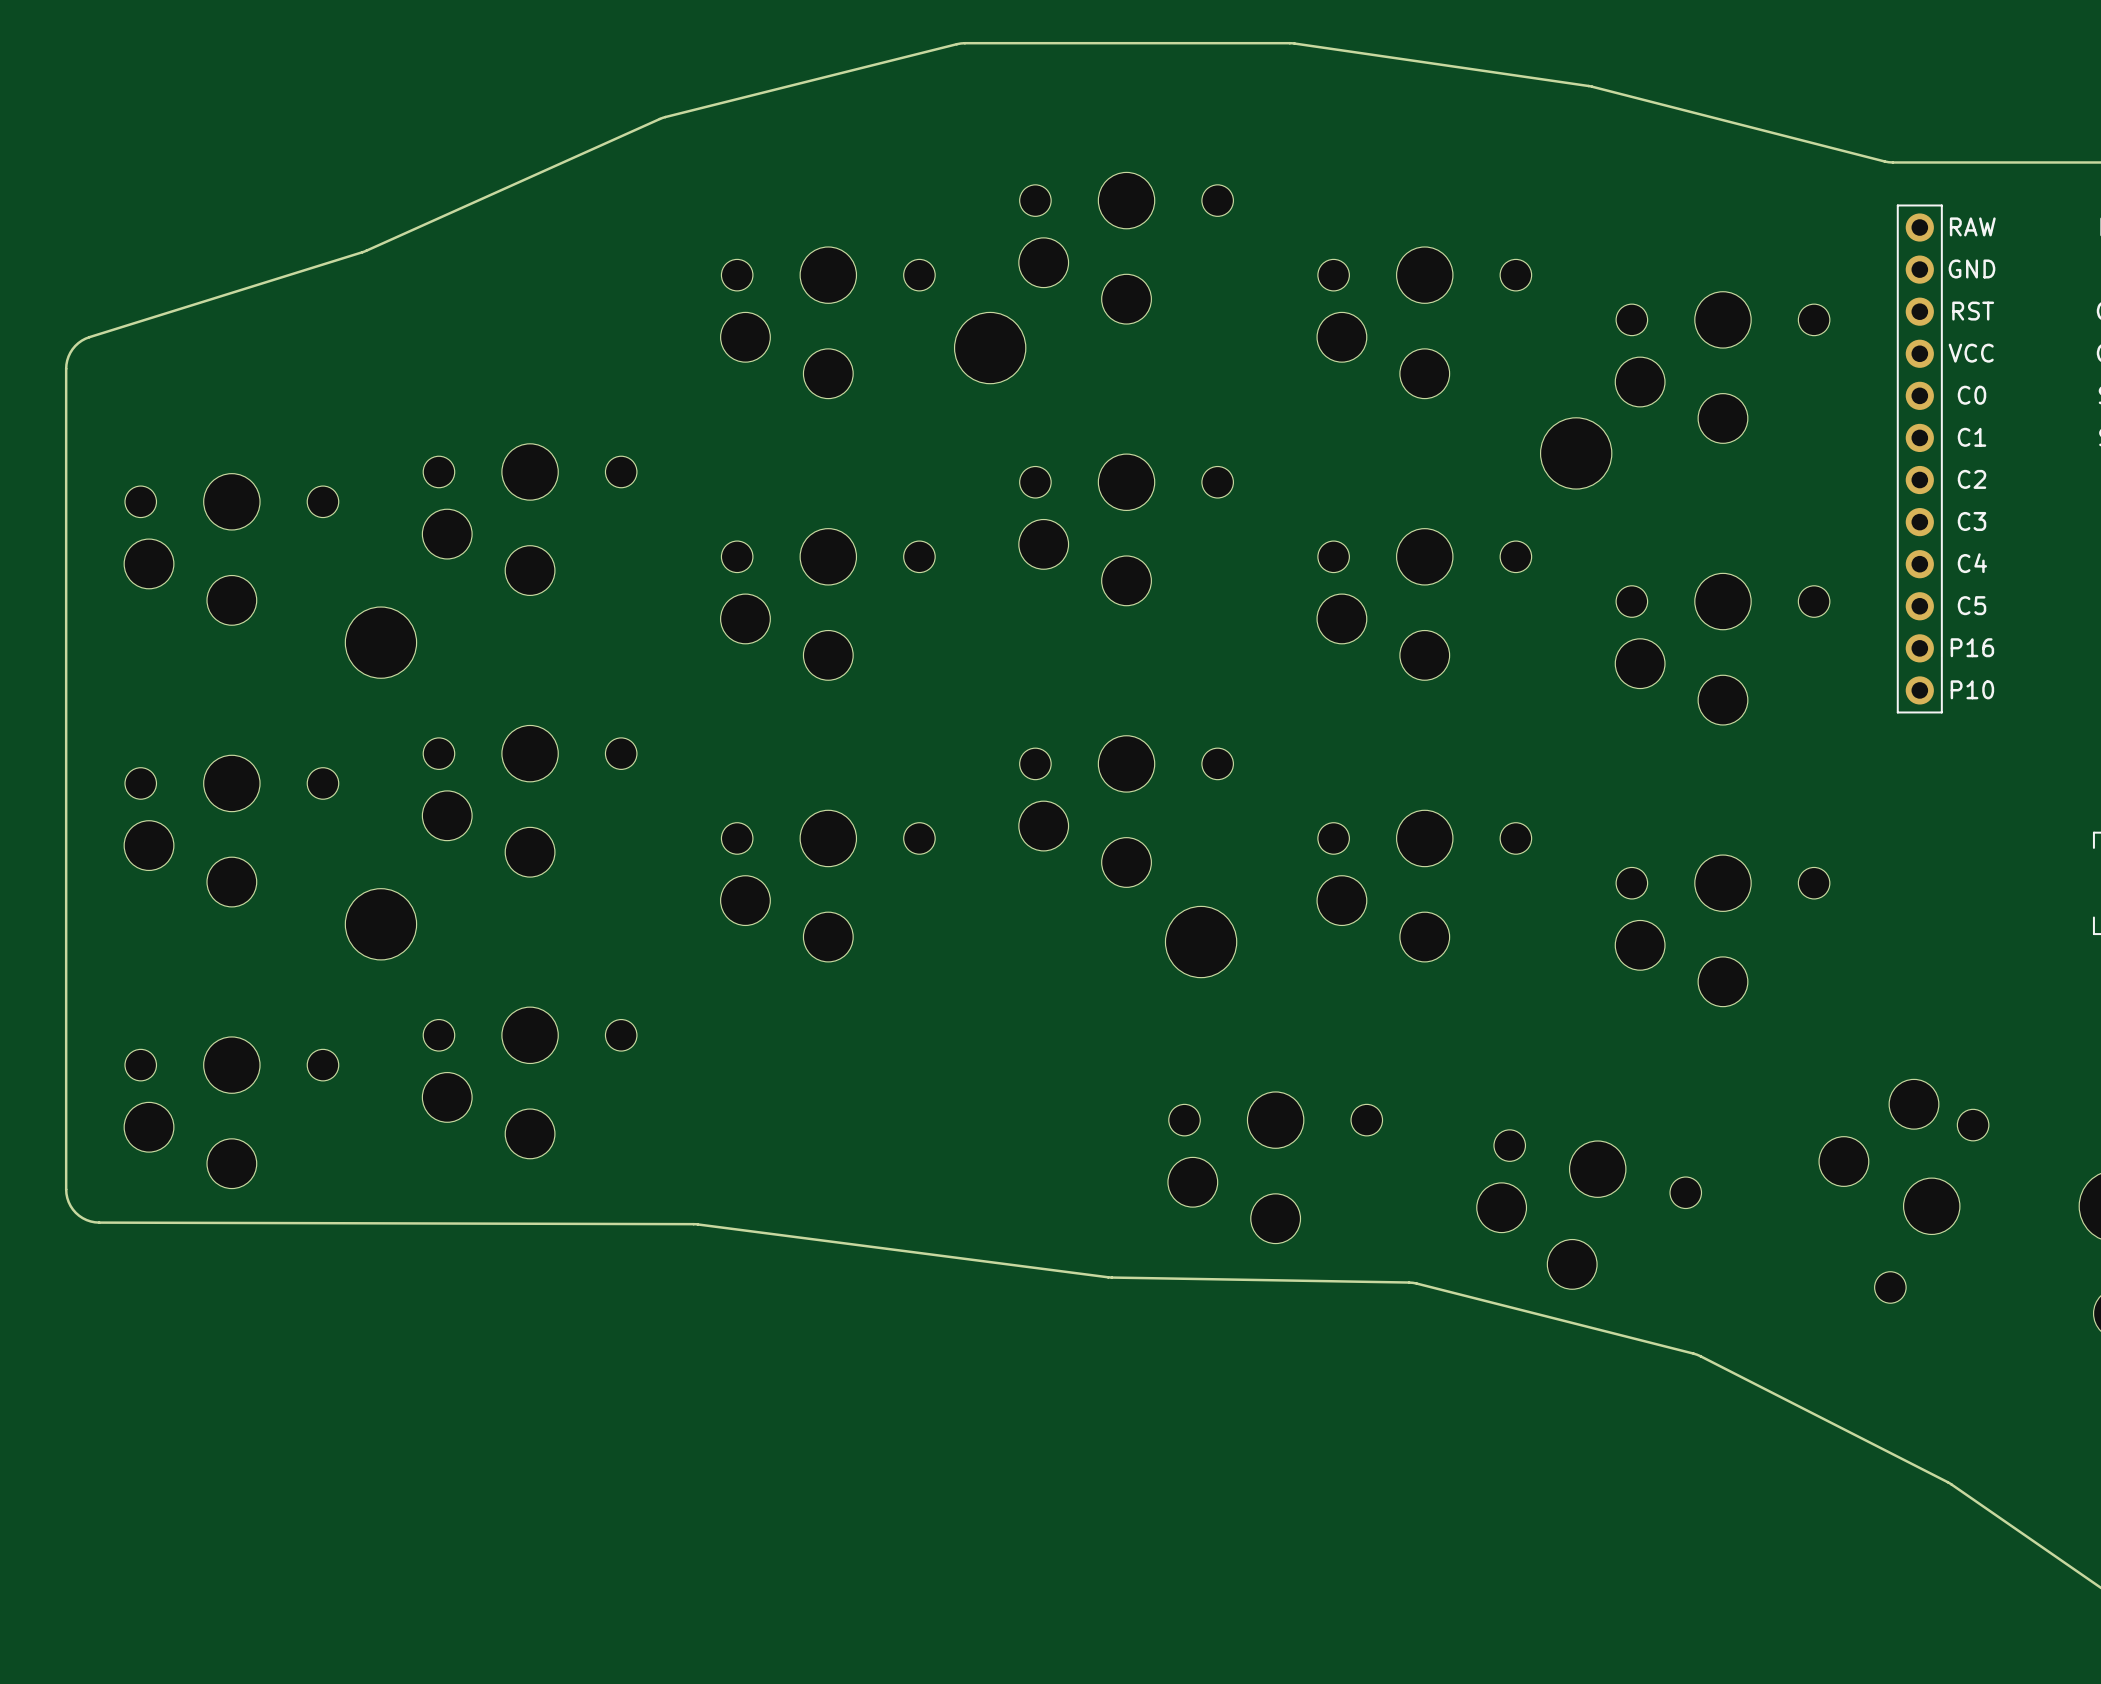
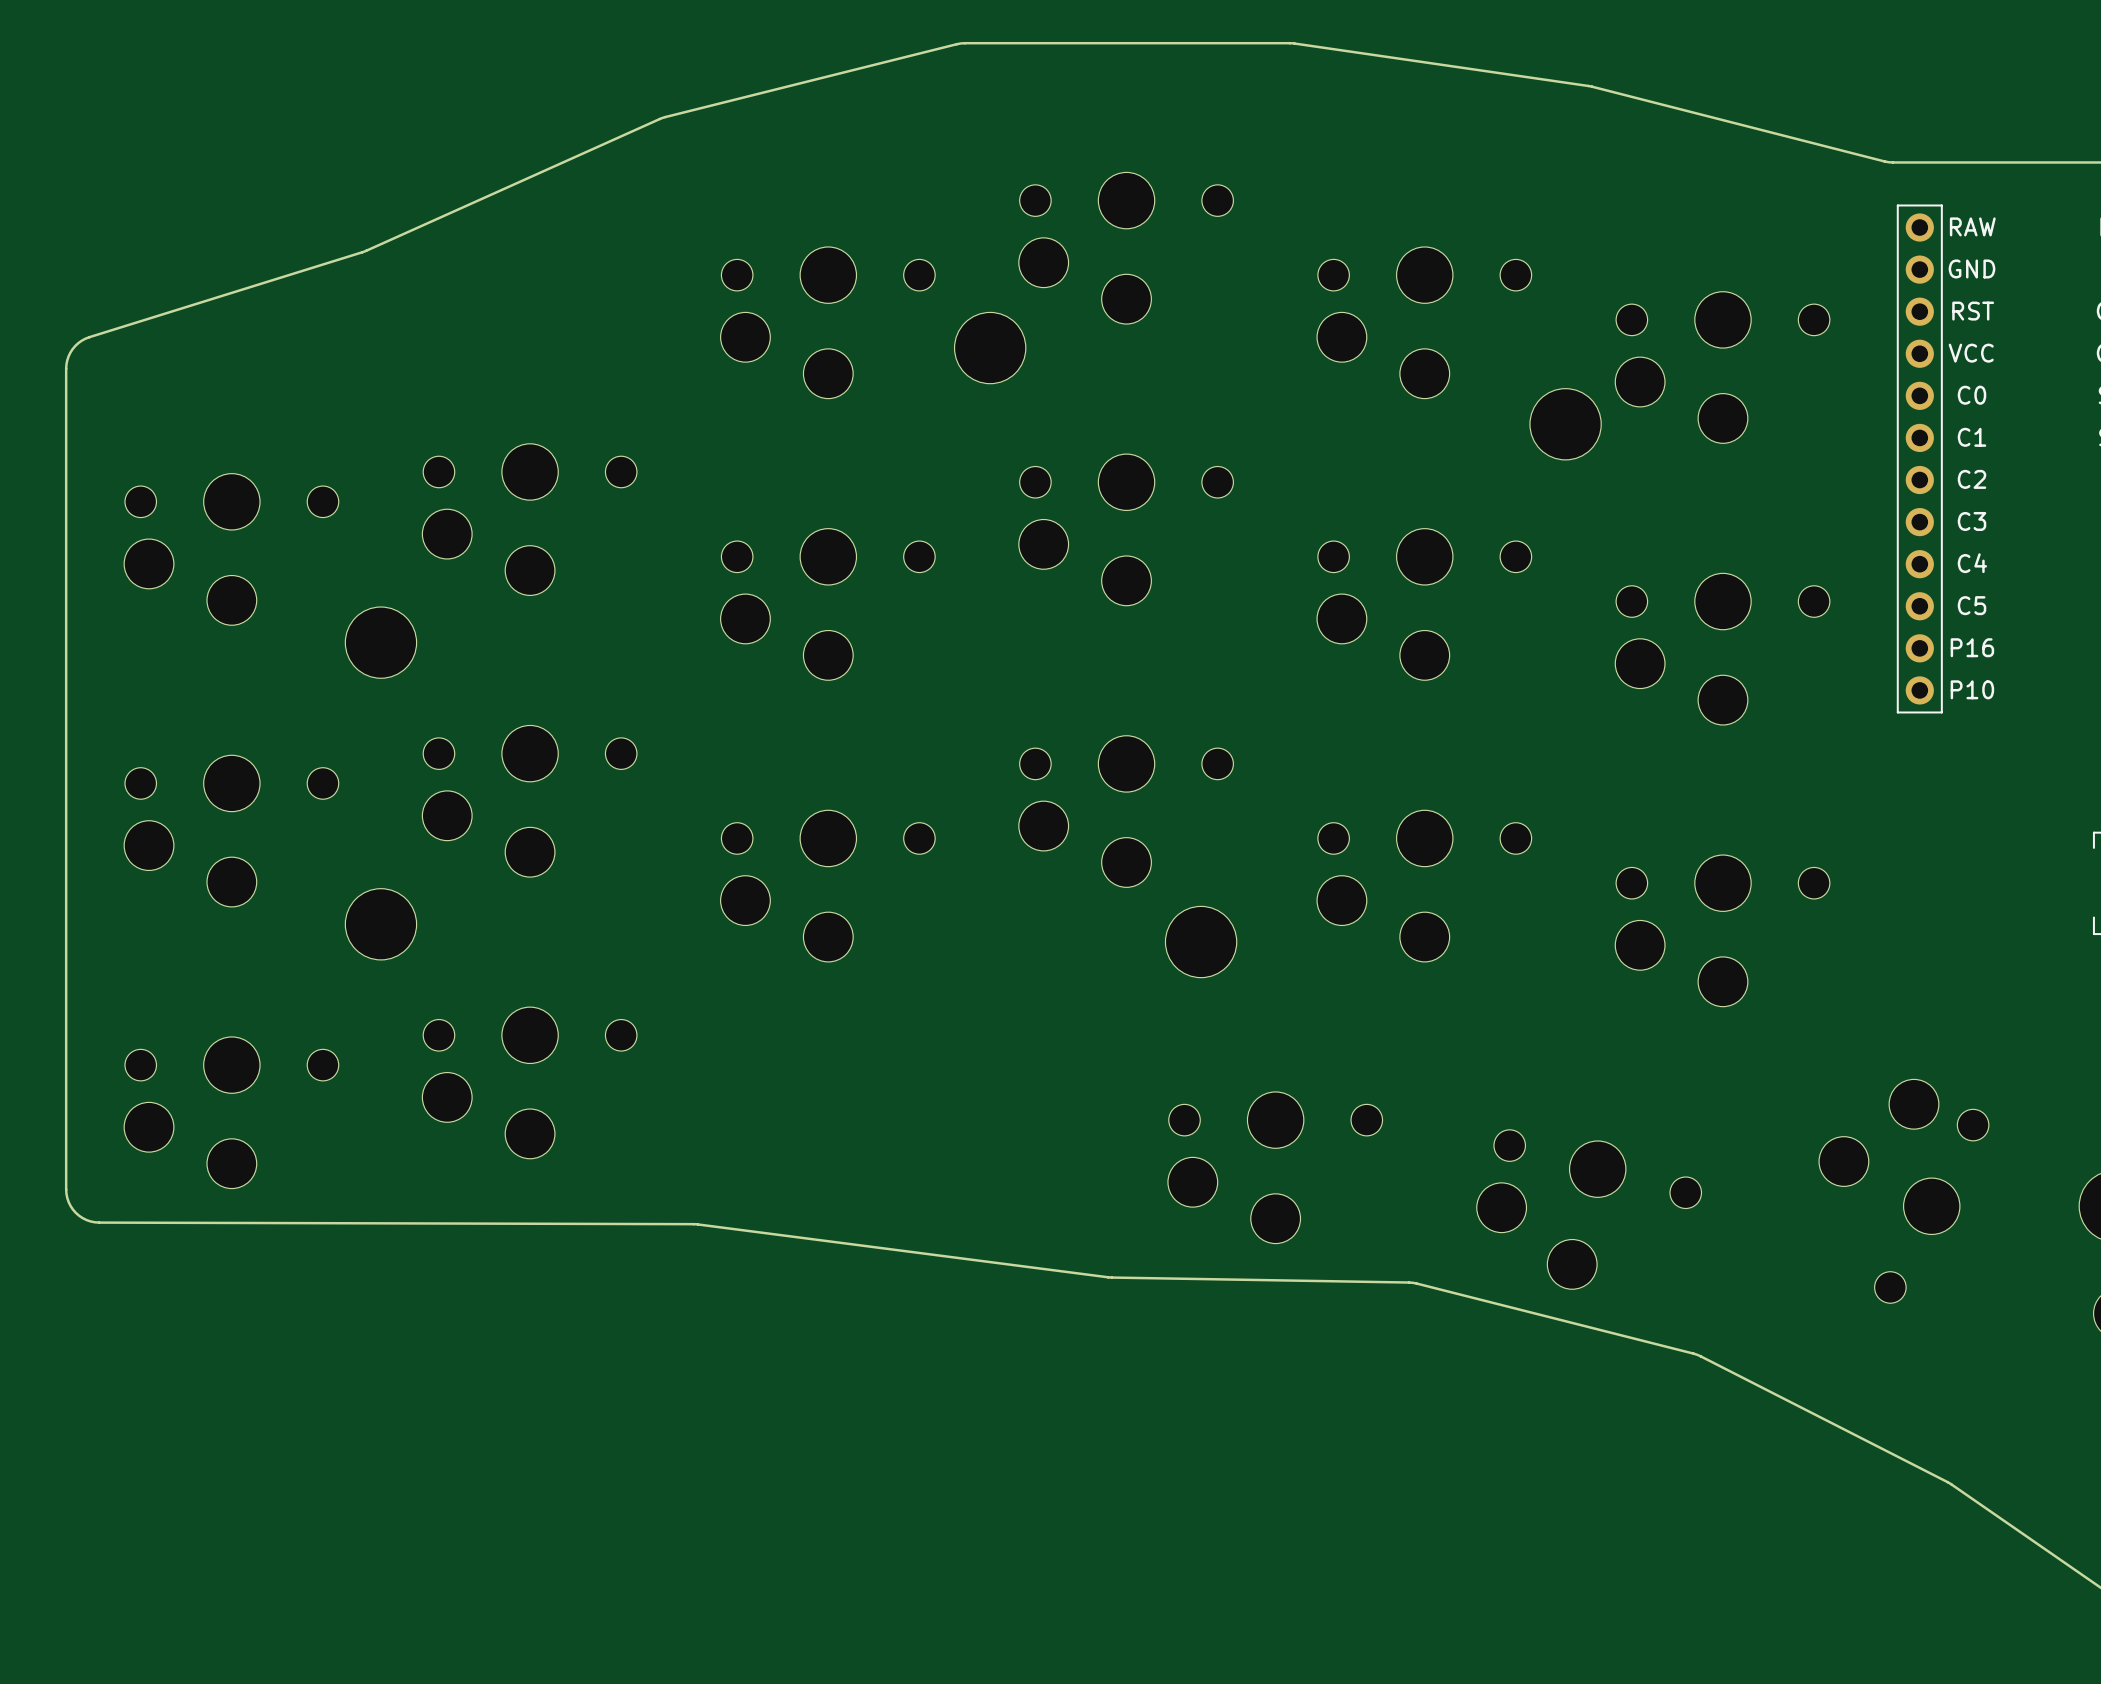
part position: (1576, 453) -> (1565, 424)

